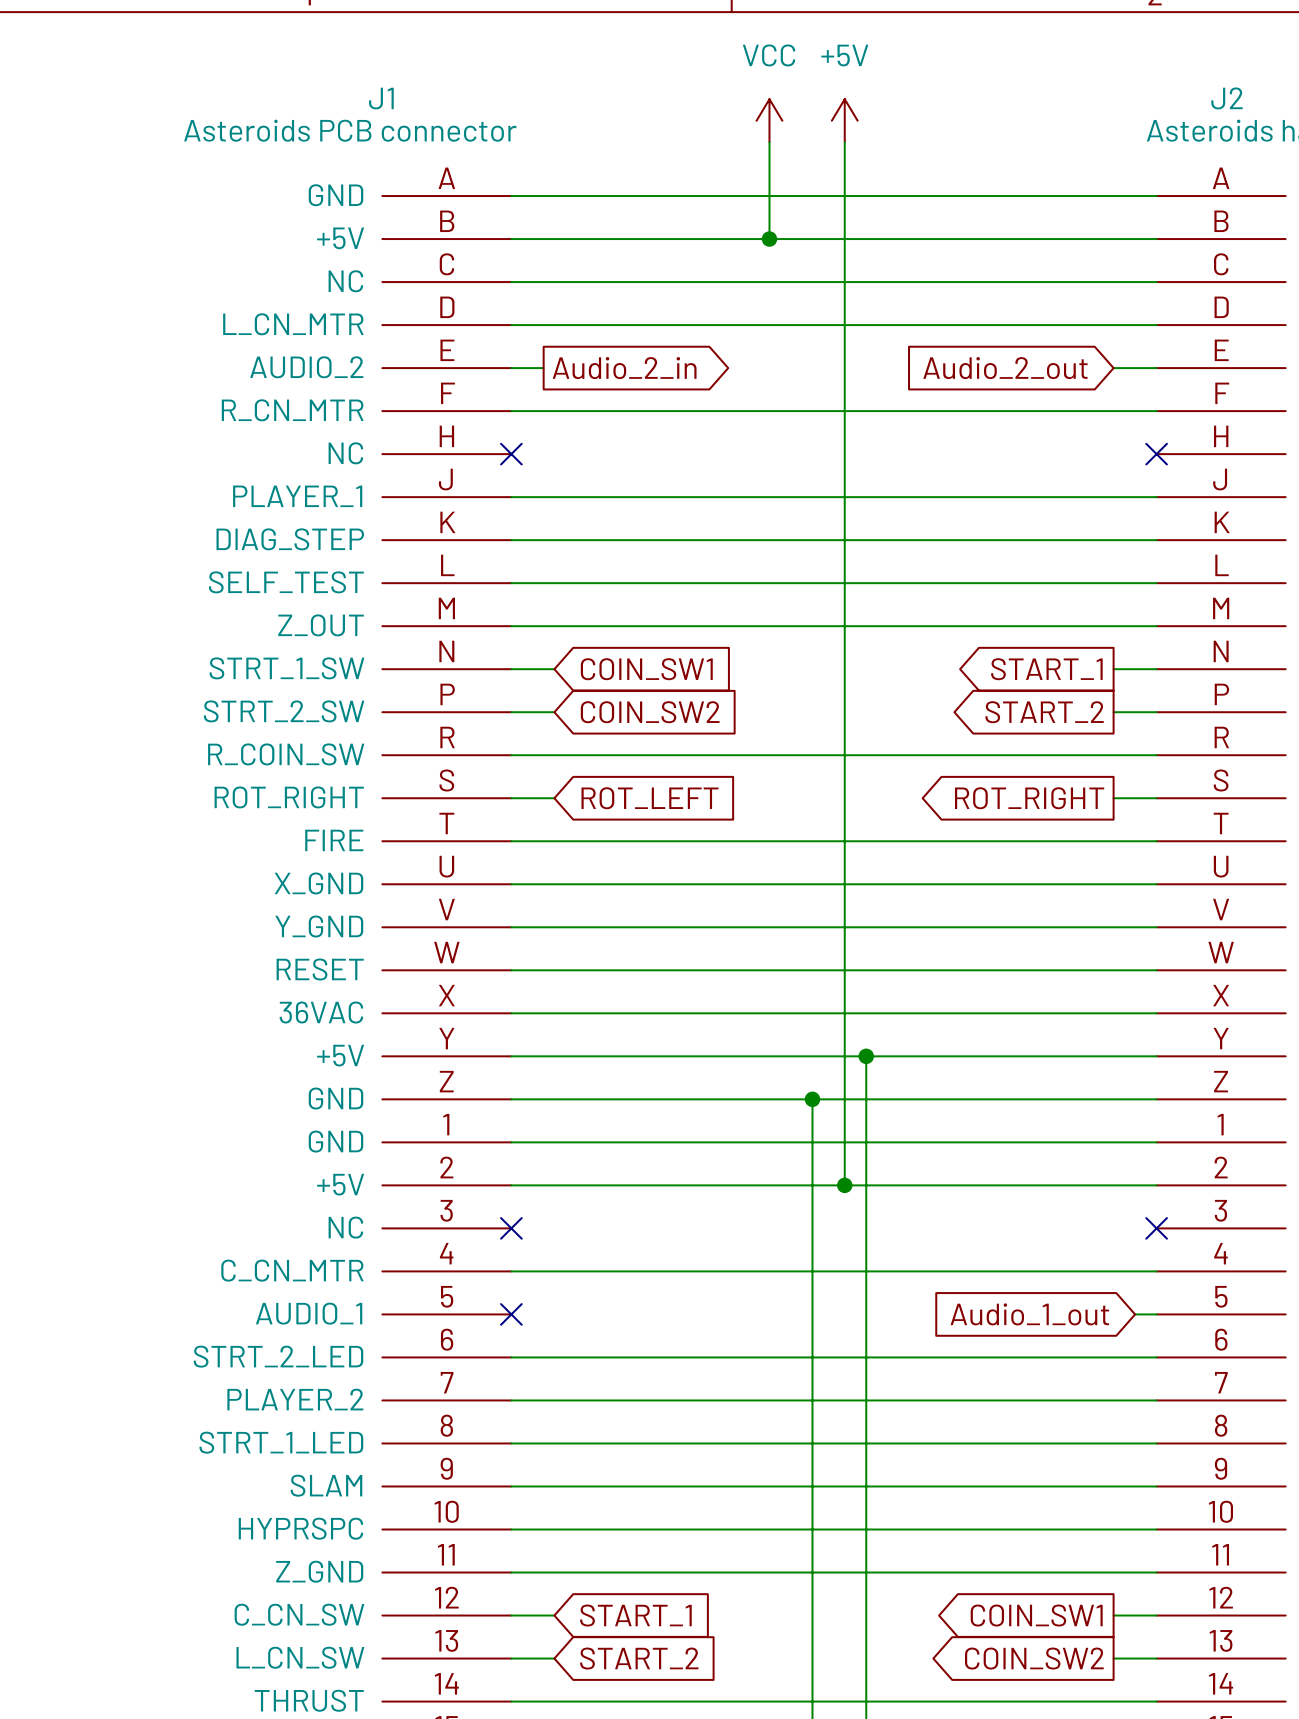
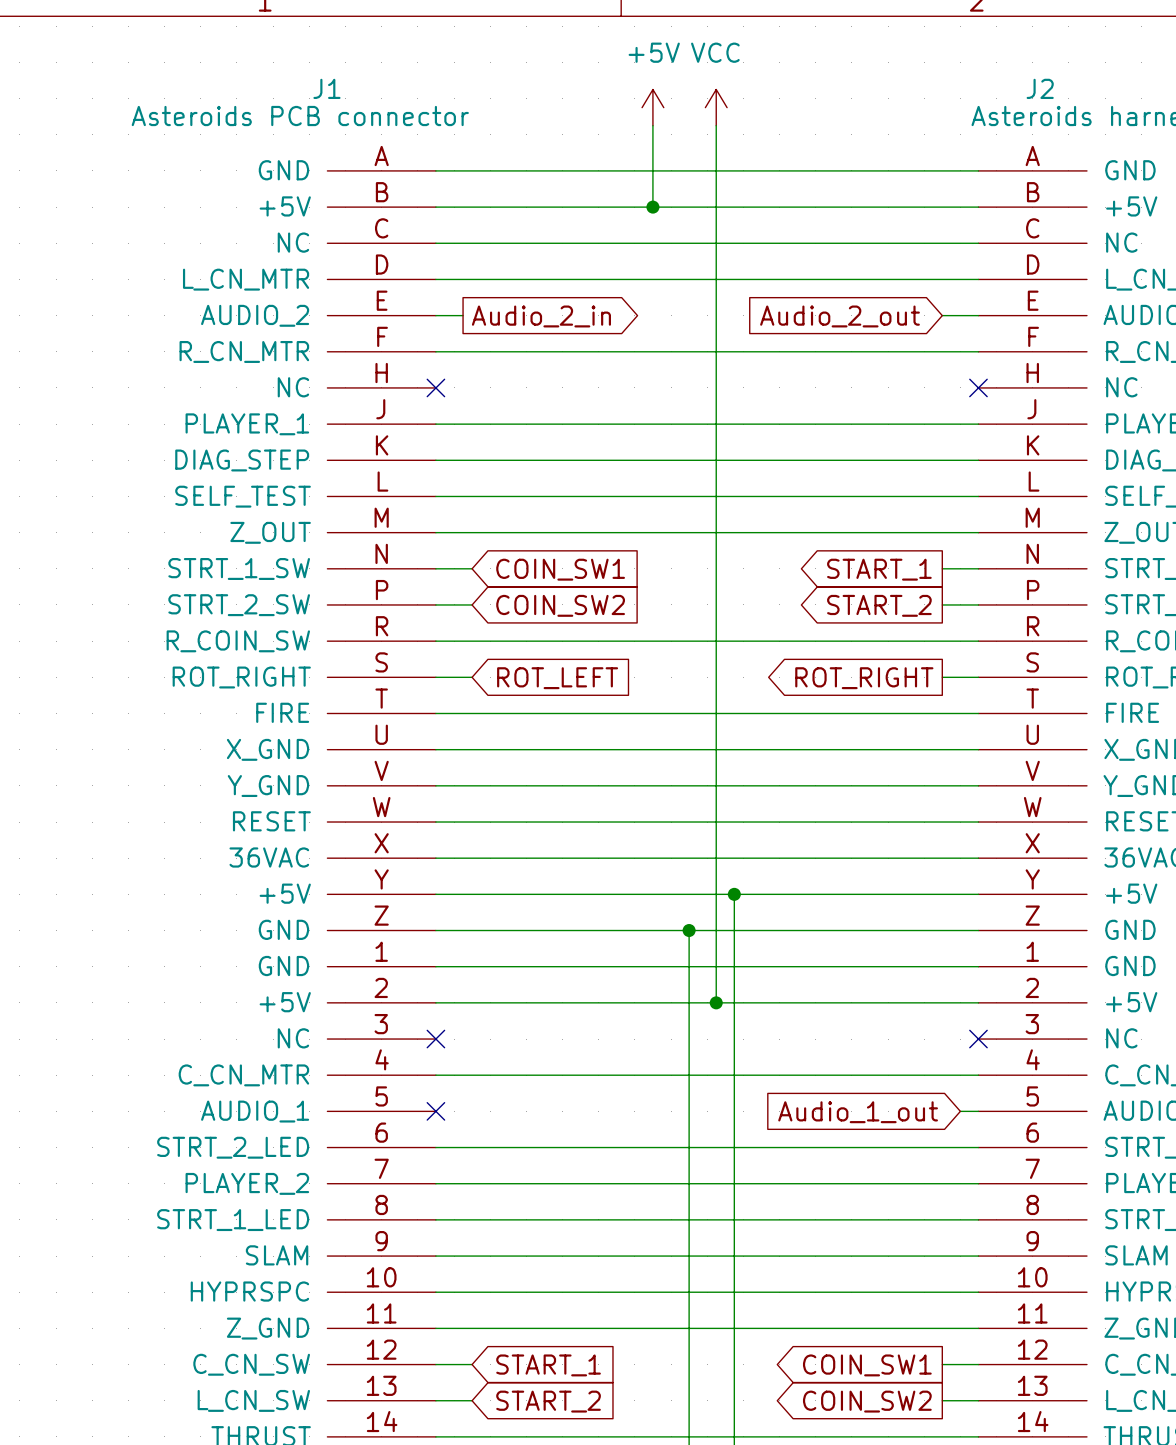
power symbol: VCC (769, 120) -> +5V (652, 107)
power symbol: +5V (844, 120) -> VCC (716, 107)

